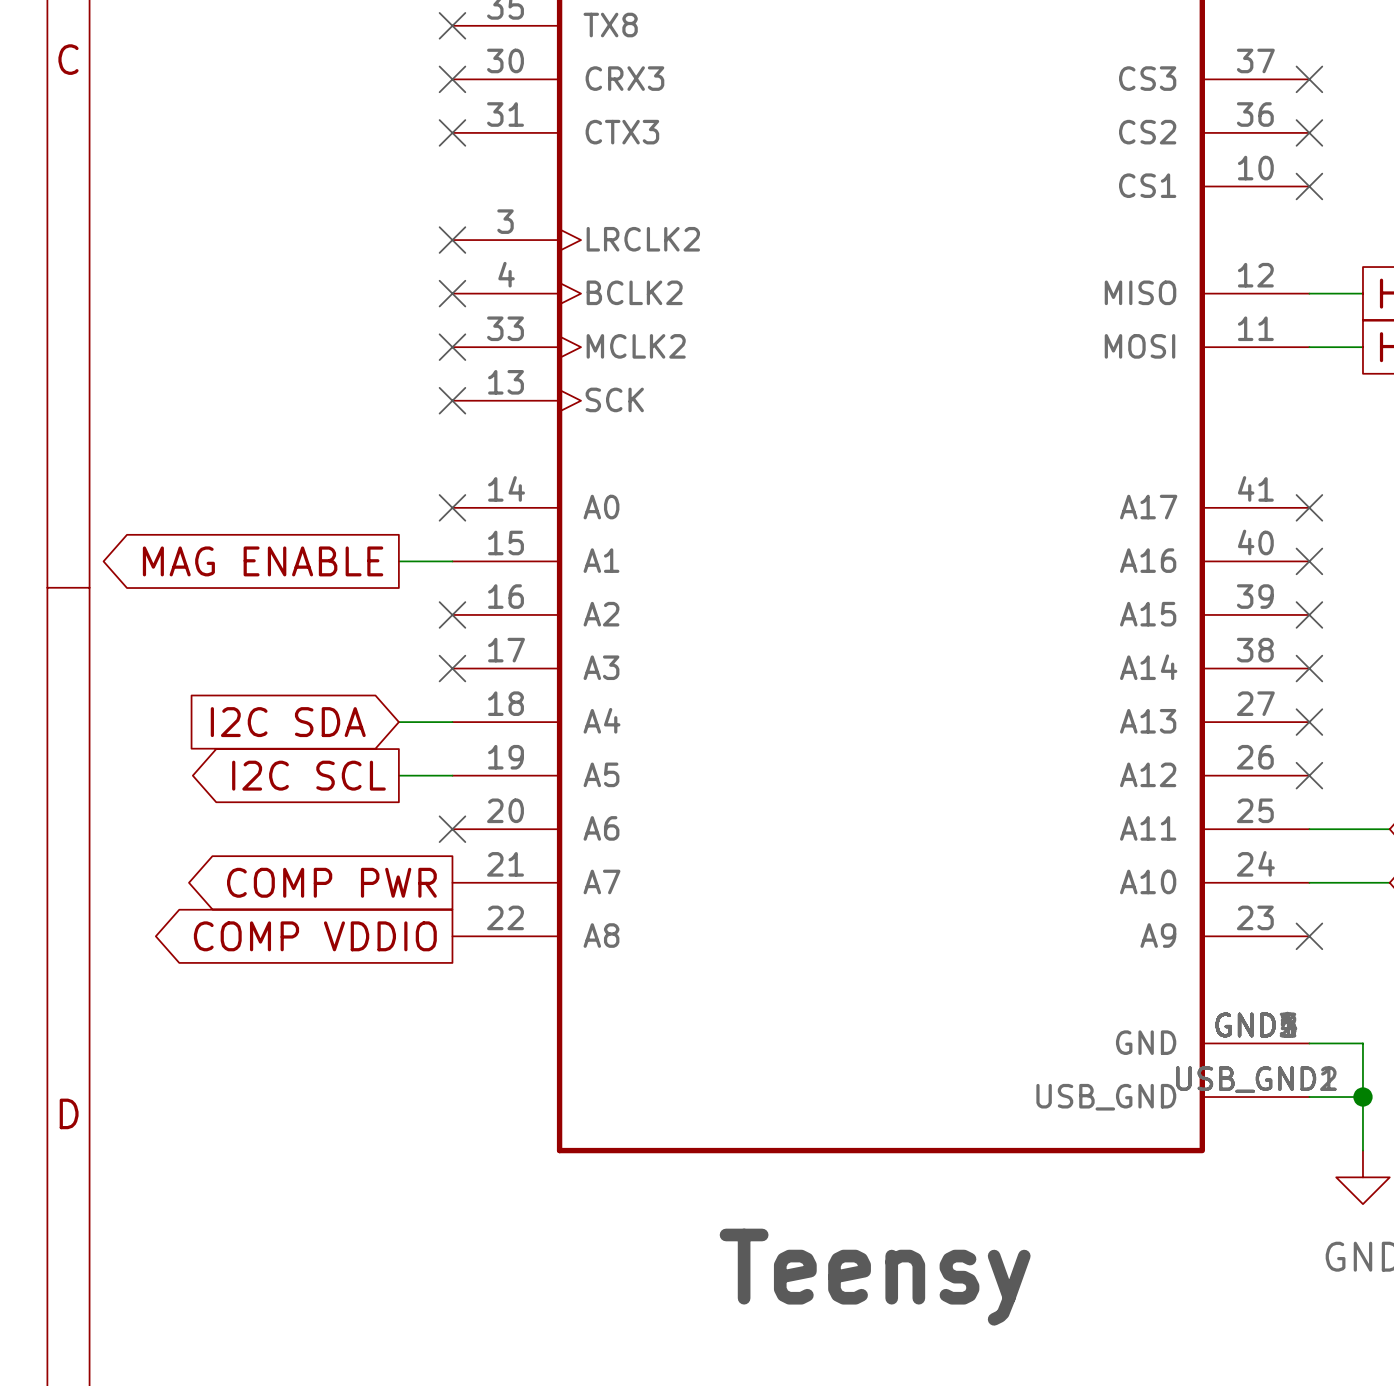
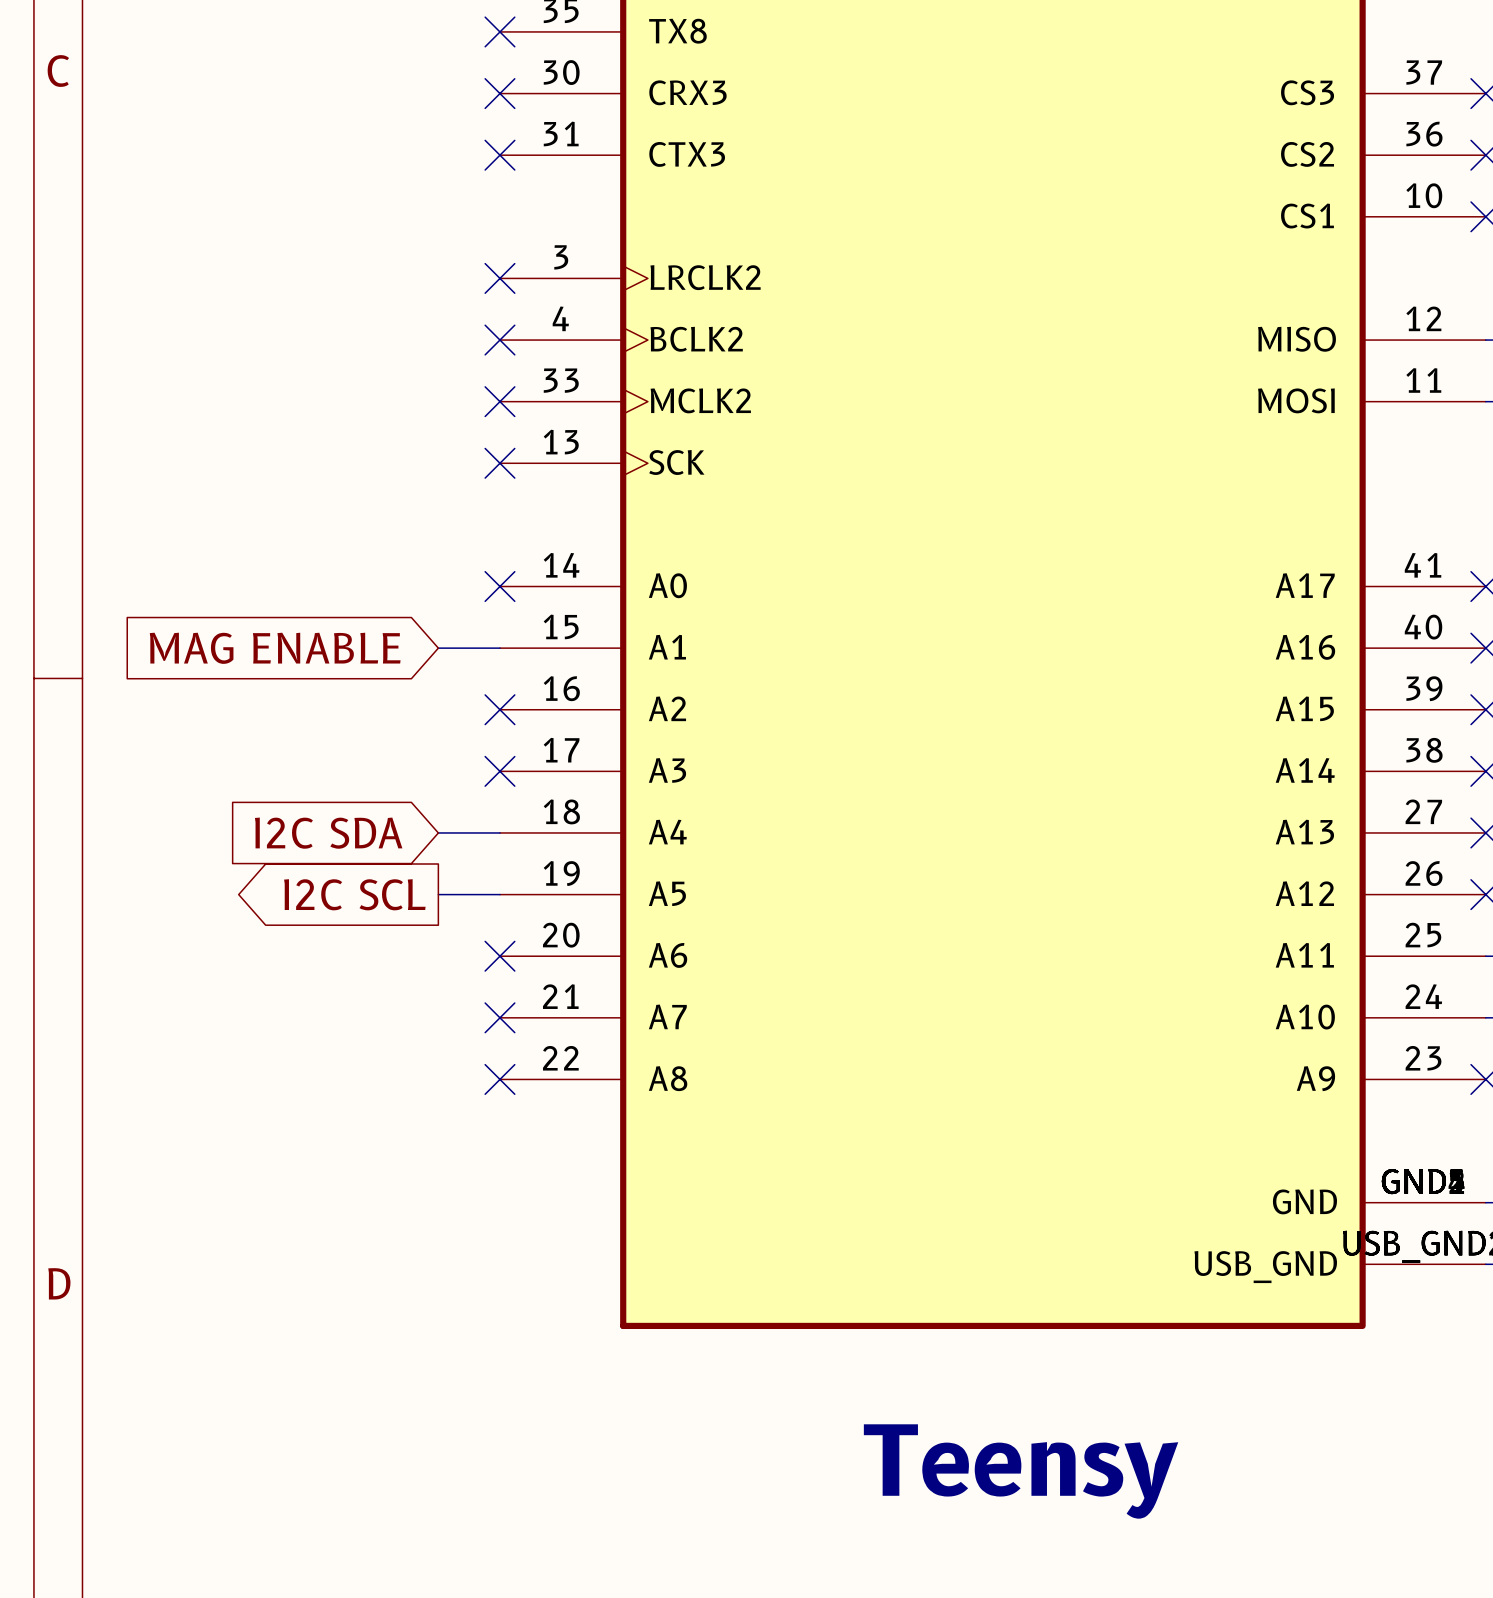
global label shape: output (263, 561) -> input (275, 648)
global label: COMP PWR (331, 882) -> none
no-connect mark: none -> (499, 1017)
global label: COMP VDDIO (315, 936) -> none
no-connect mark: none -> (499, 1079)

